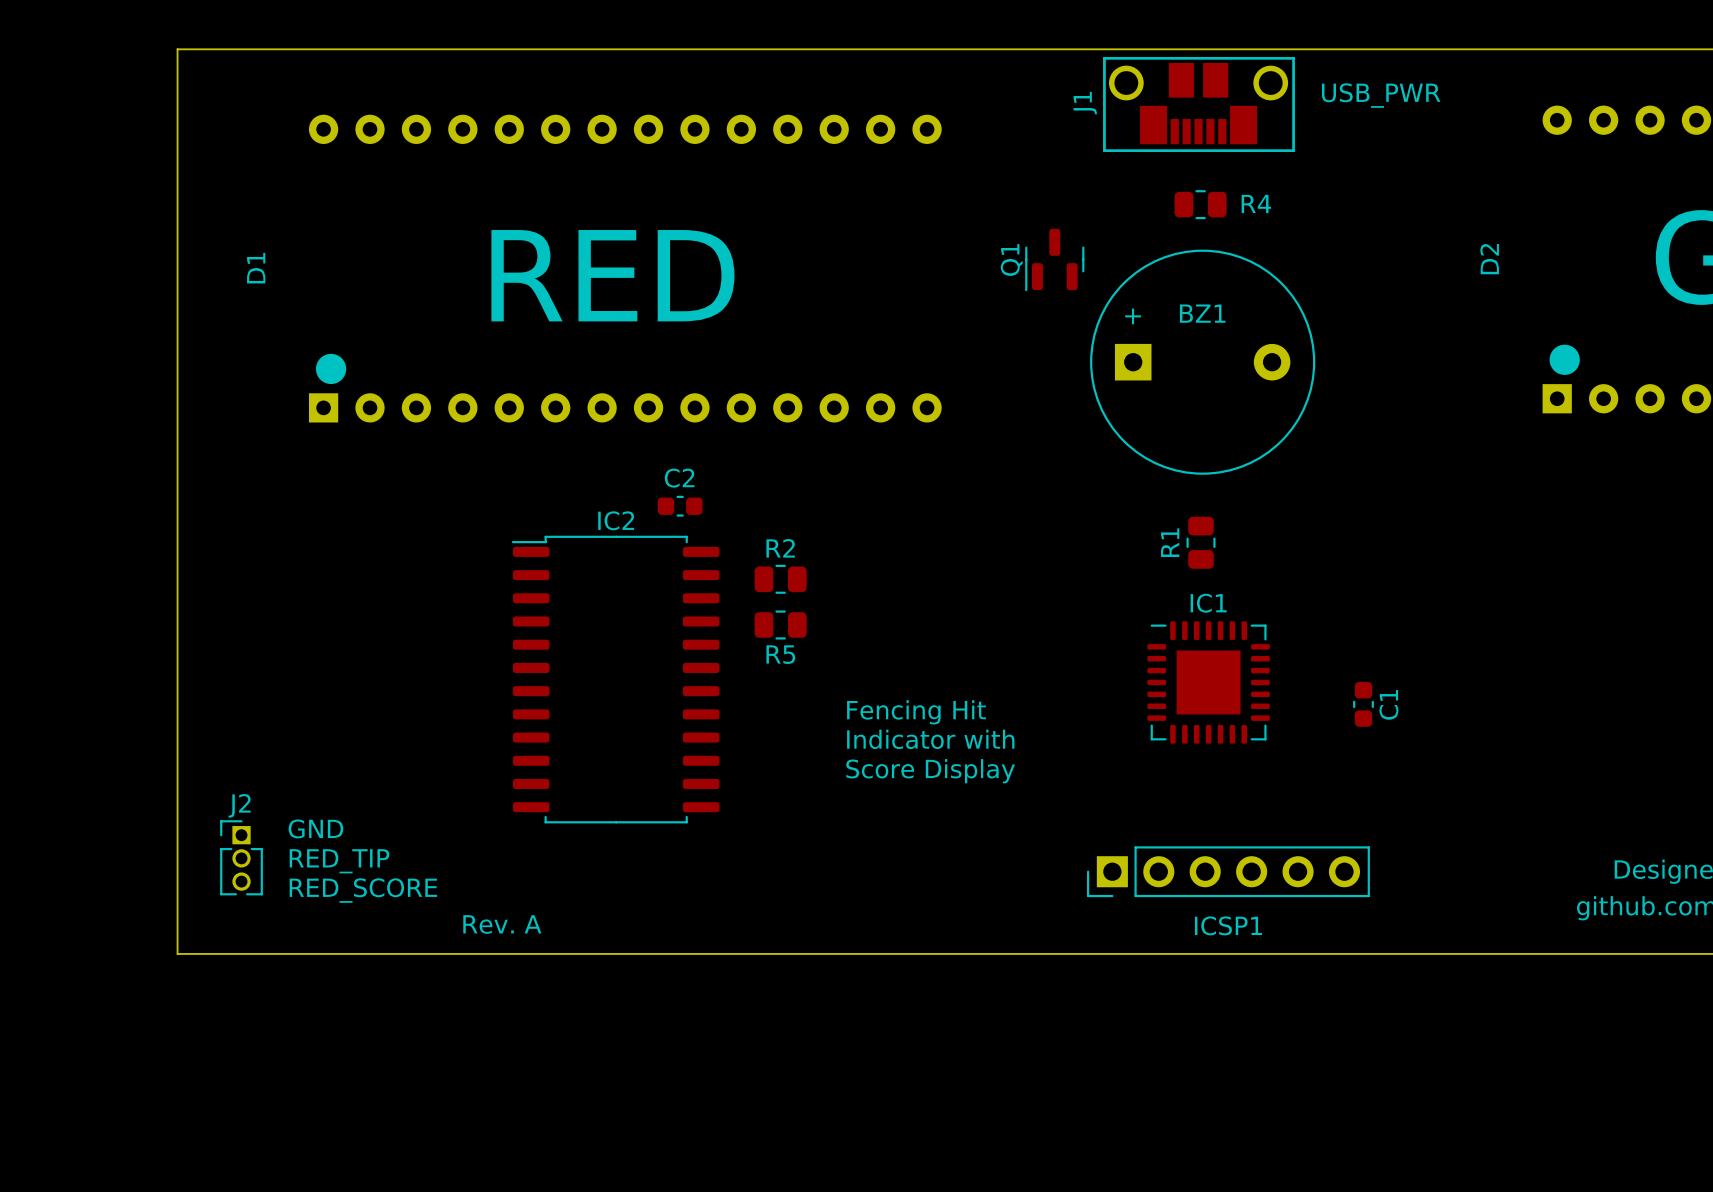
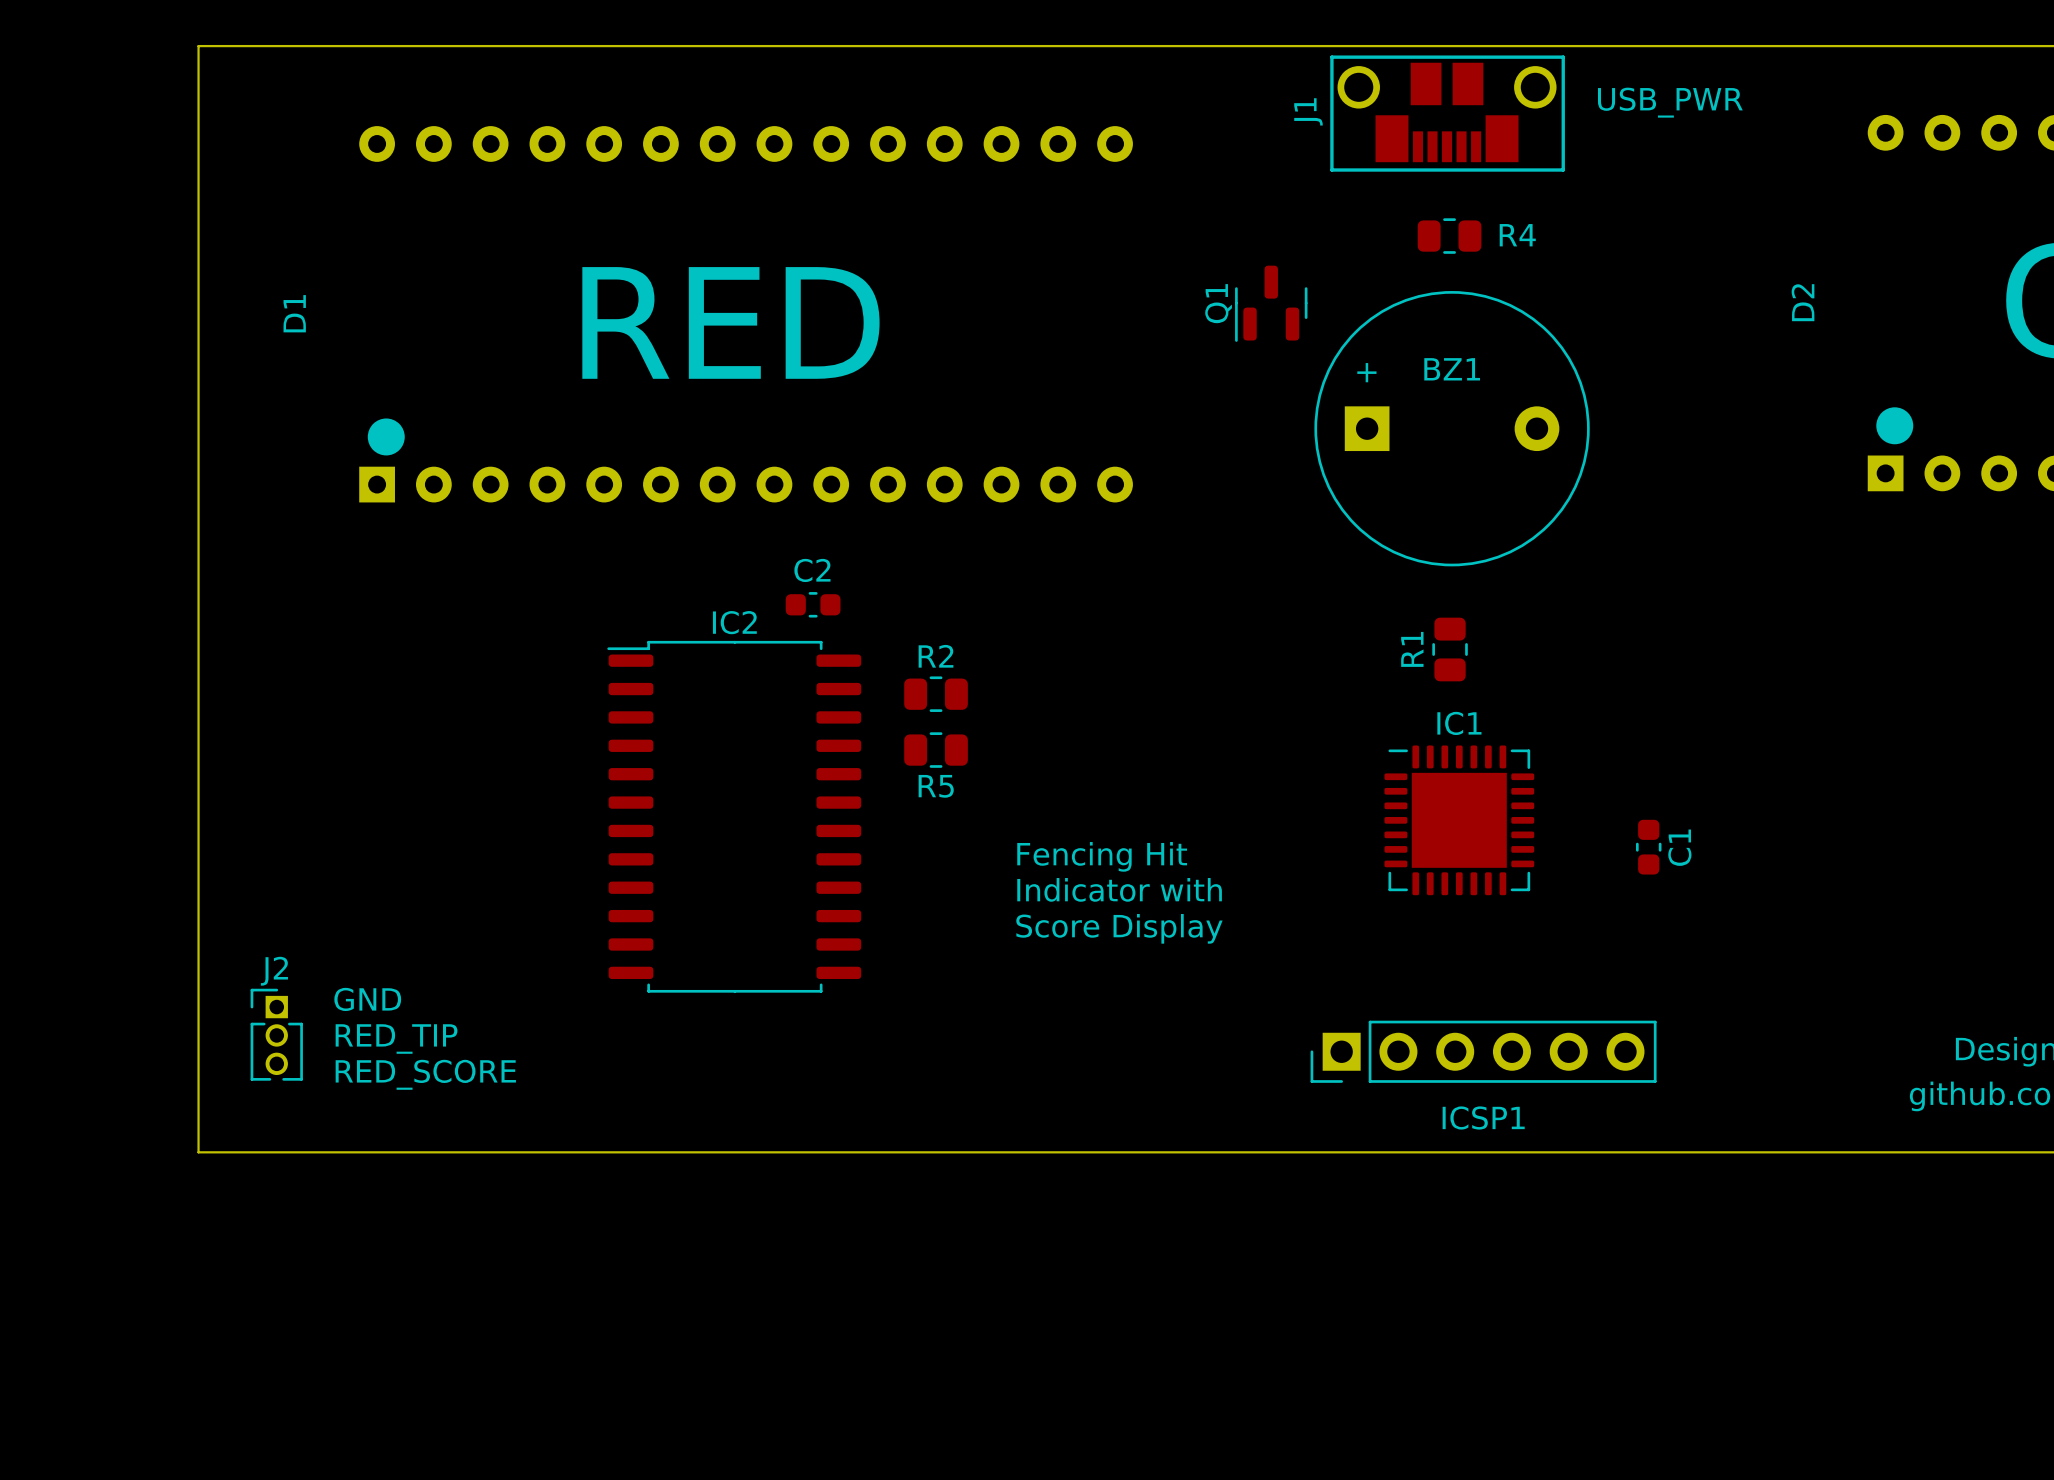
IC1 footprint: [1147, 621, 1270, 744] -> [1384, 745, 1535, 896]
text: Rev. A (502, 924) -> none

